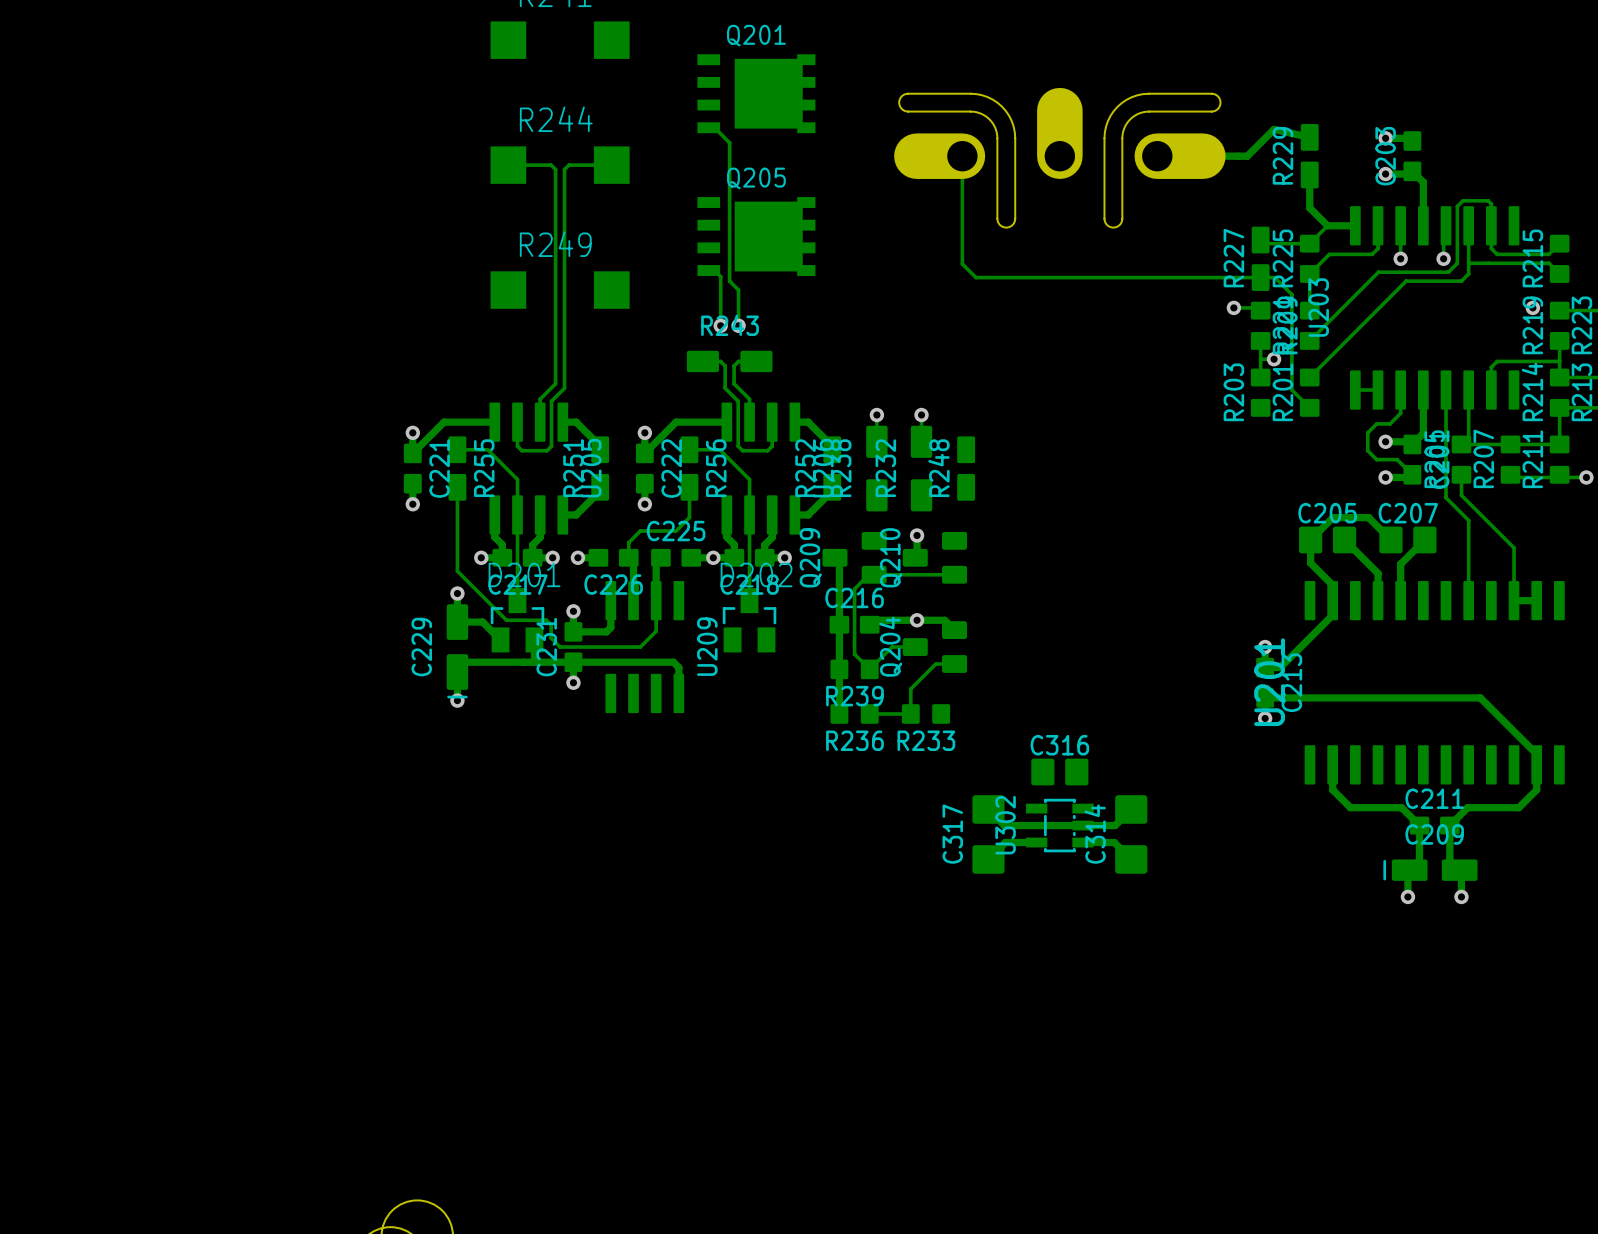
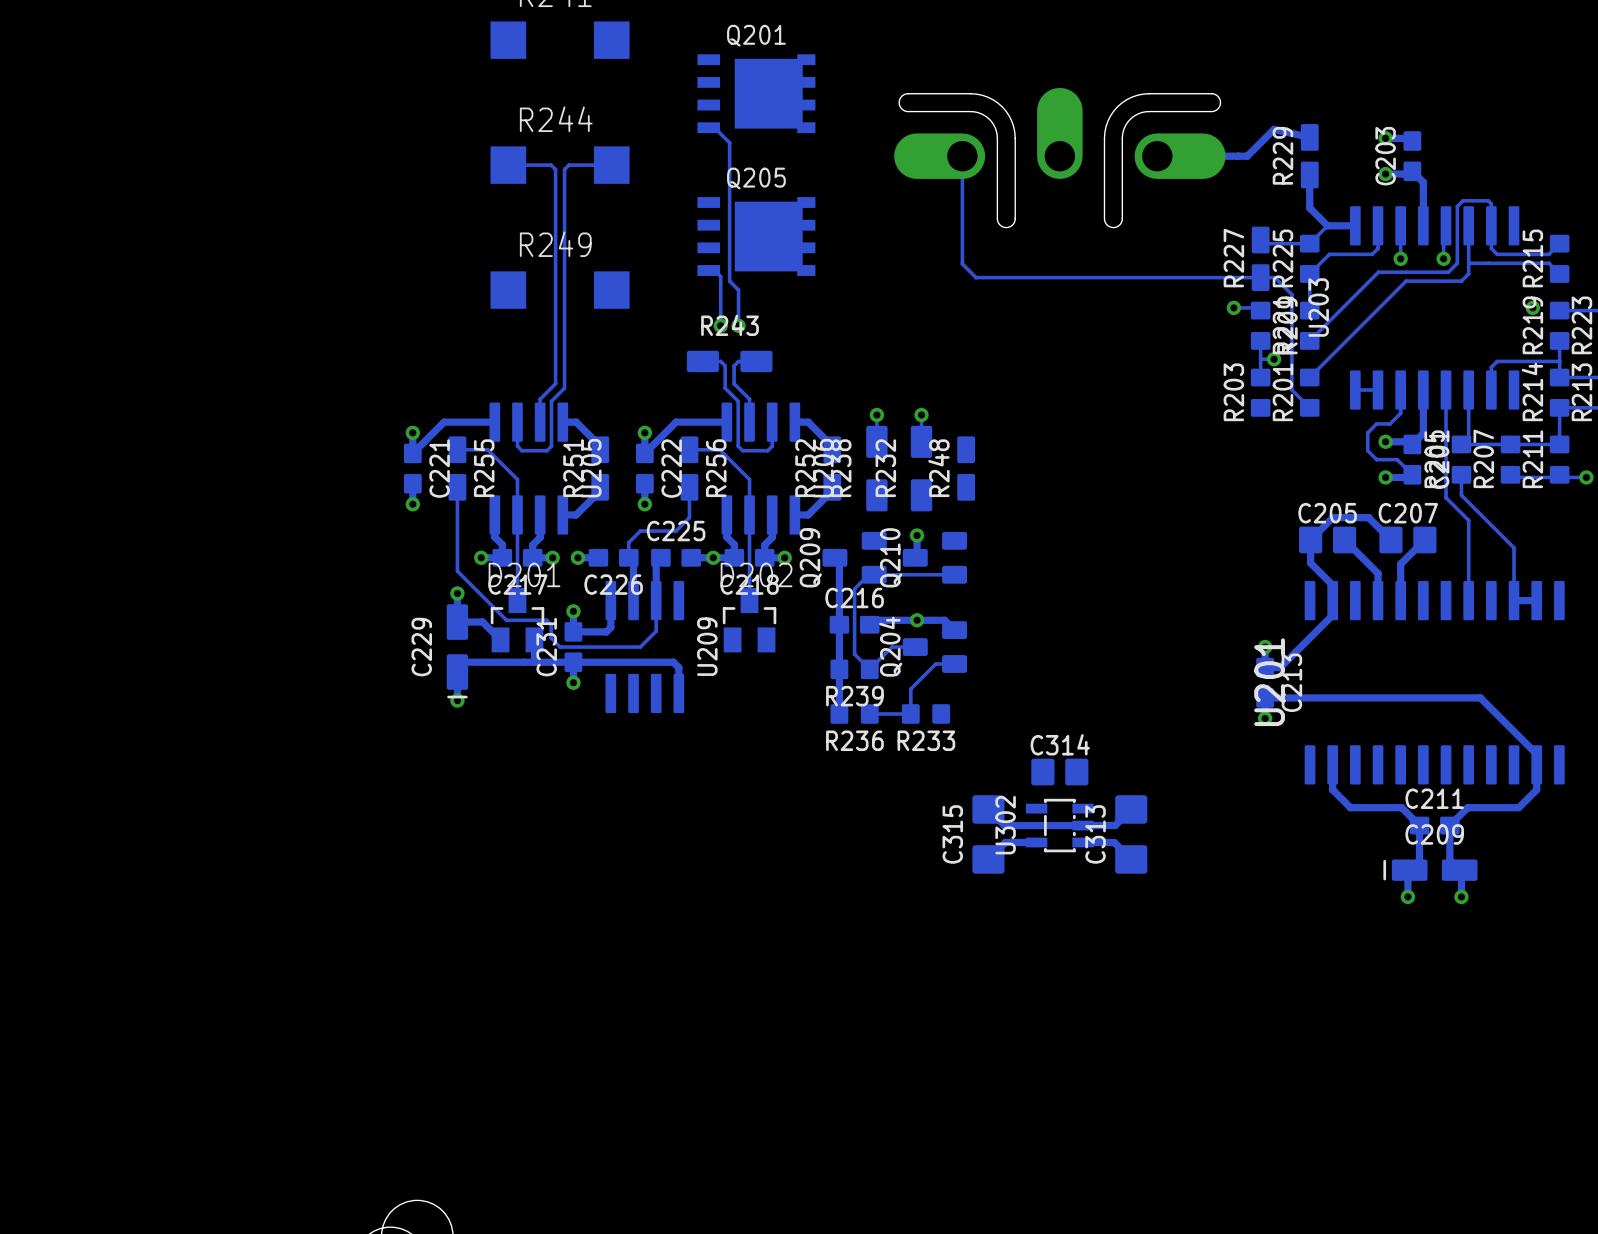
C316 name: C316 (1059, 745) -> C314 (1060, 744)
C317 name: C317 (952, 834) -> C315 (952, 834)
C314 name: C314 (1095, 834) -> C313 (1095, 834)

